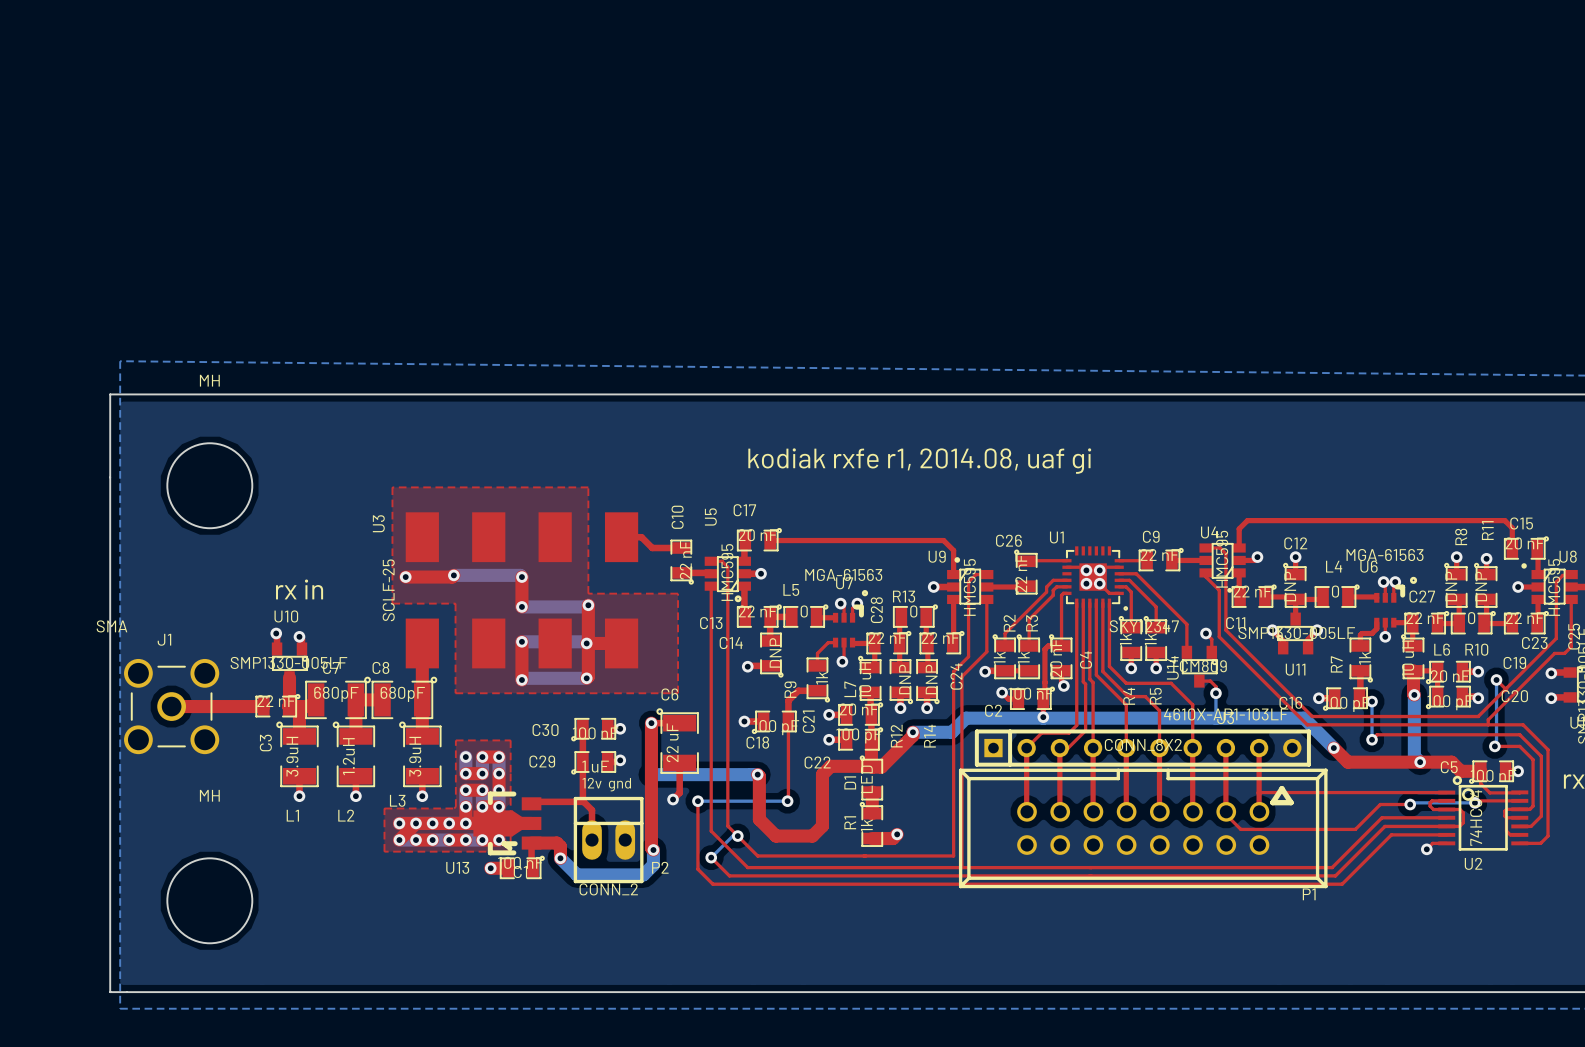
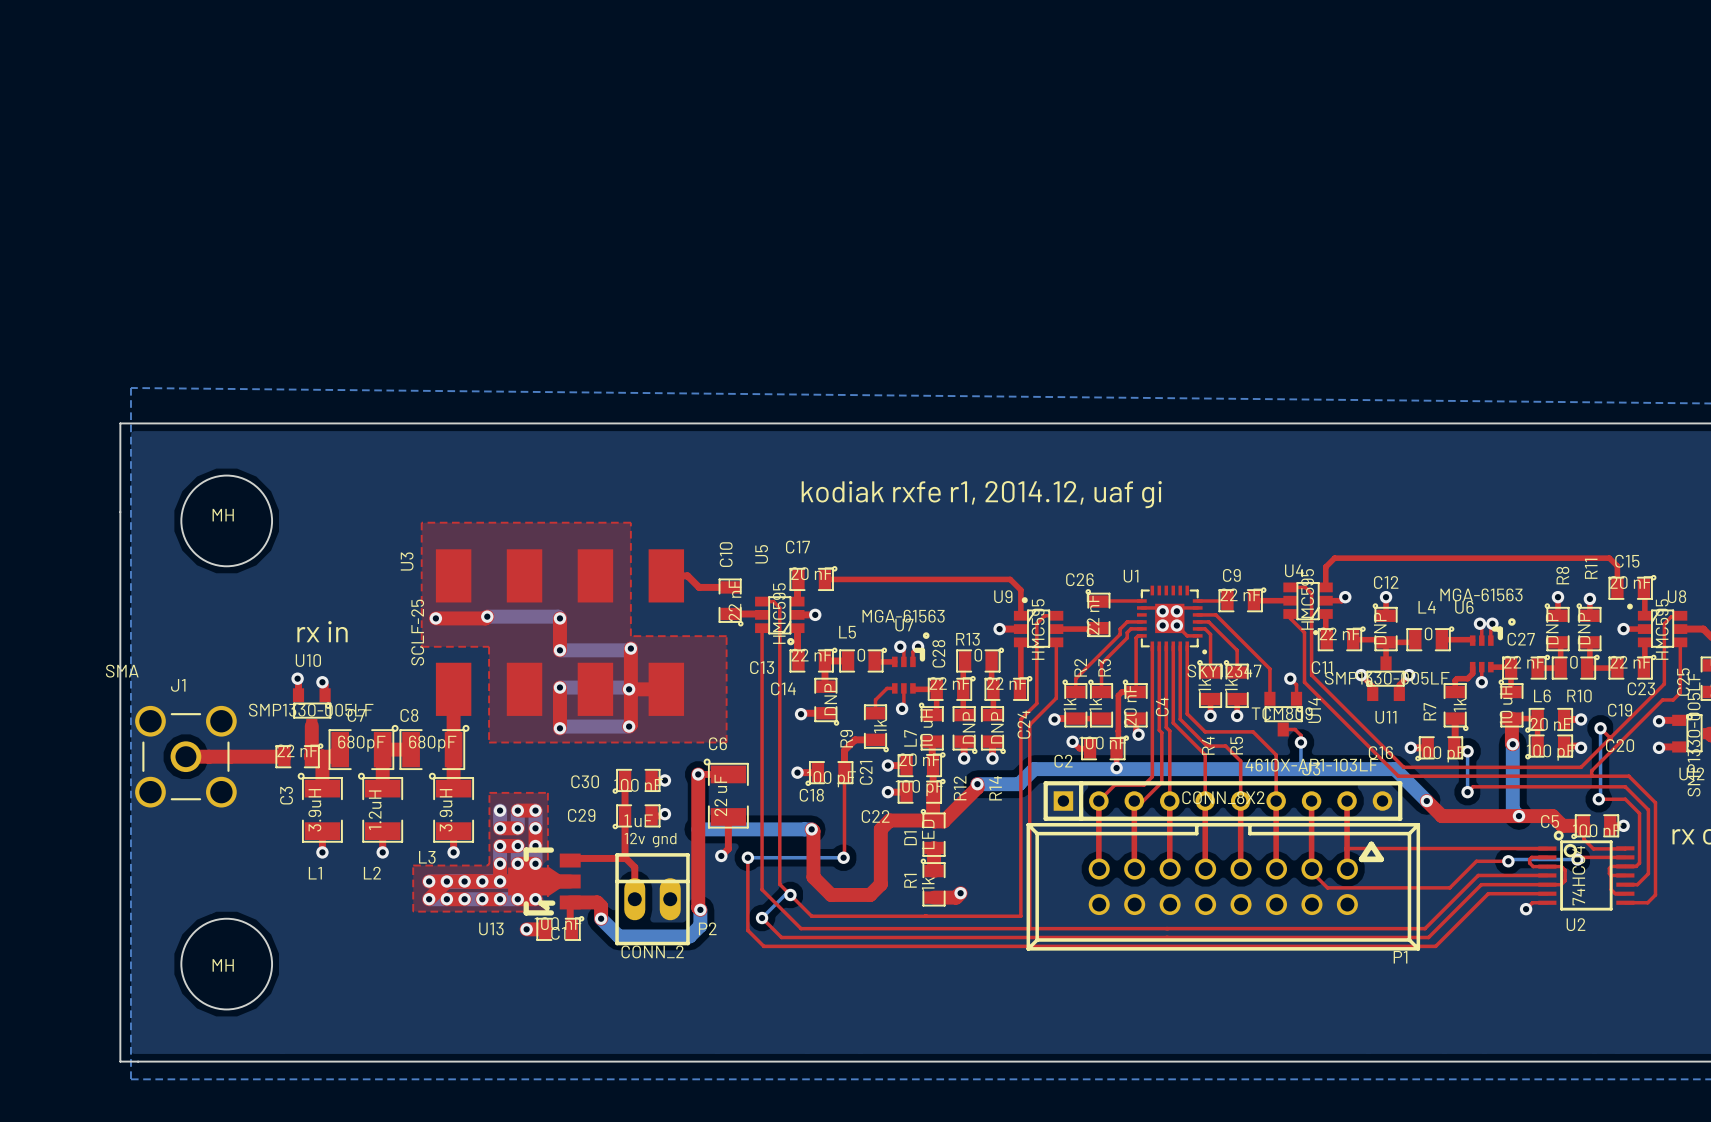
MH name position: MH (209, 380) -> MH (223, 515)
text: kodiak rxfe r1, 2014.08, uaf gi (919, 461) -> kodiak rxfe r1, 2014.12, uaf gi (981, 494)
U14 name position: U14 (1172, 667) -> U14 (1314, 710)
MH name position: MH (209, 795) -> MH (223, 965)

